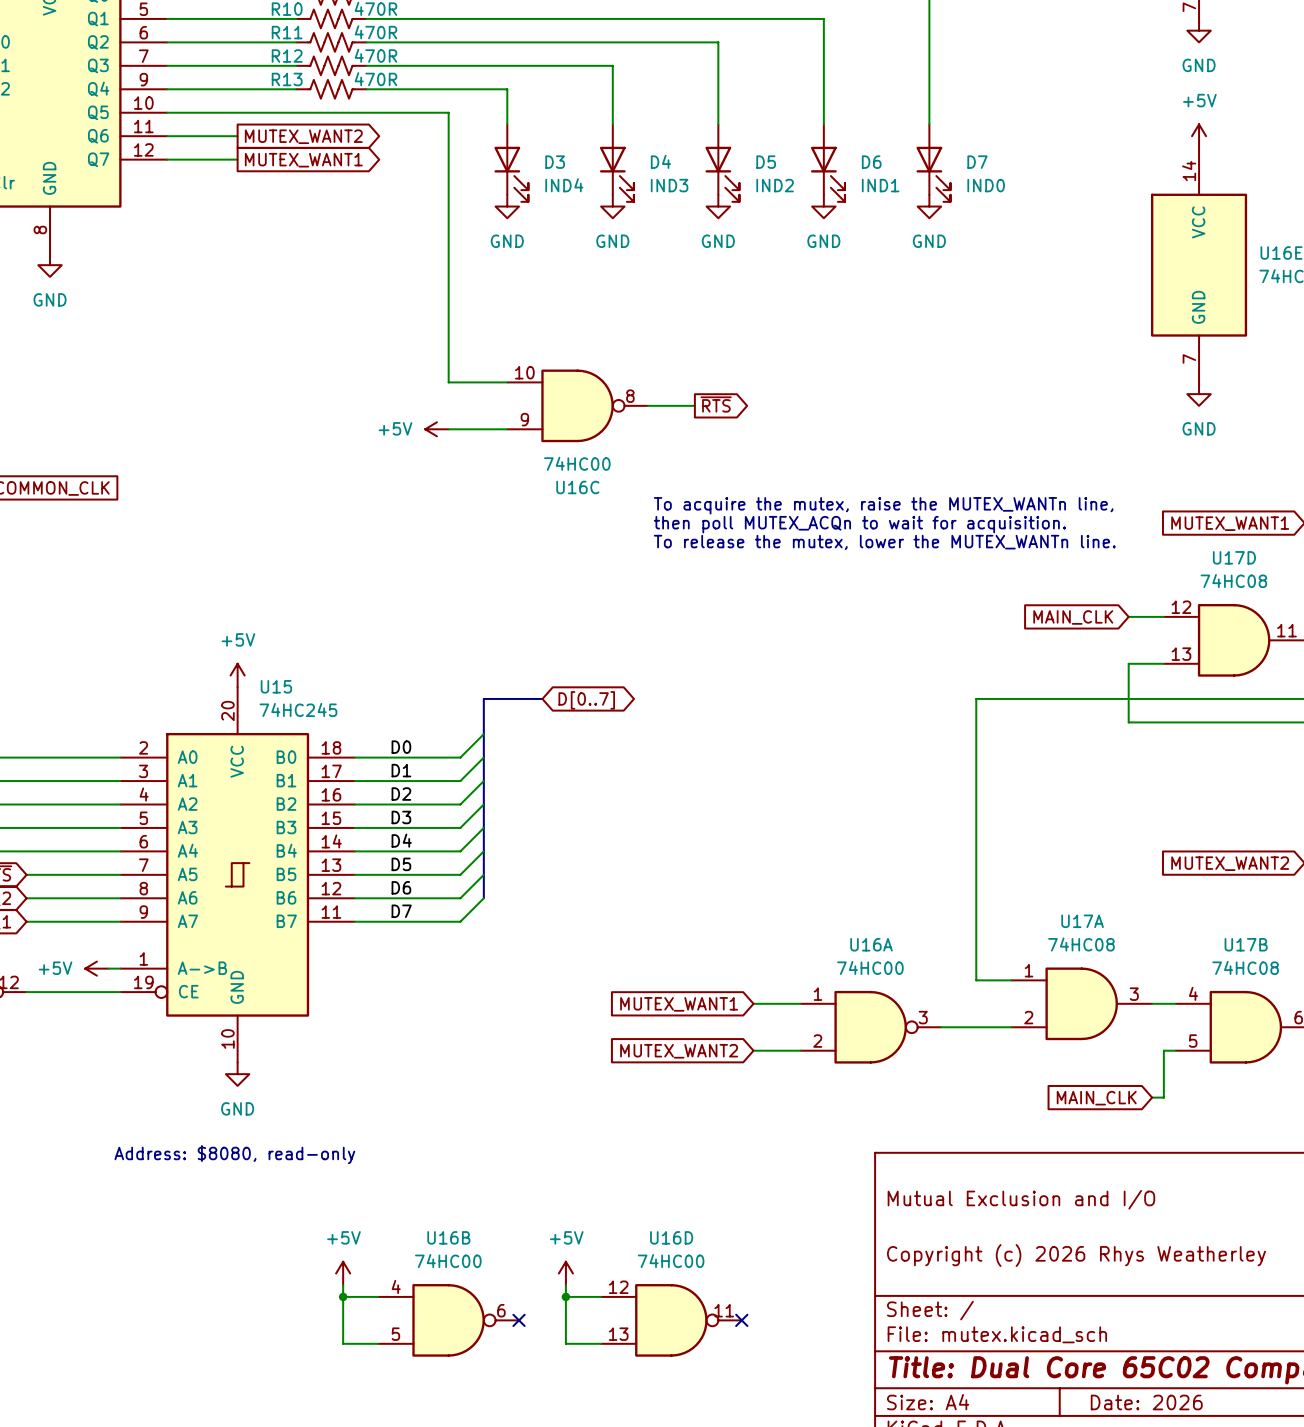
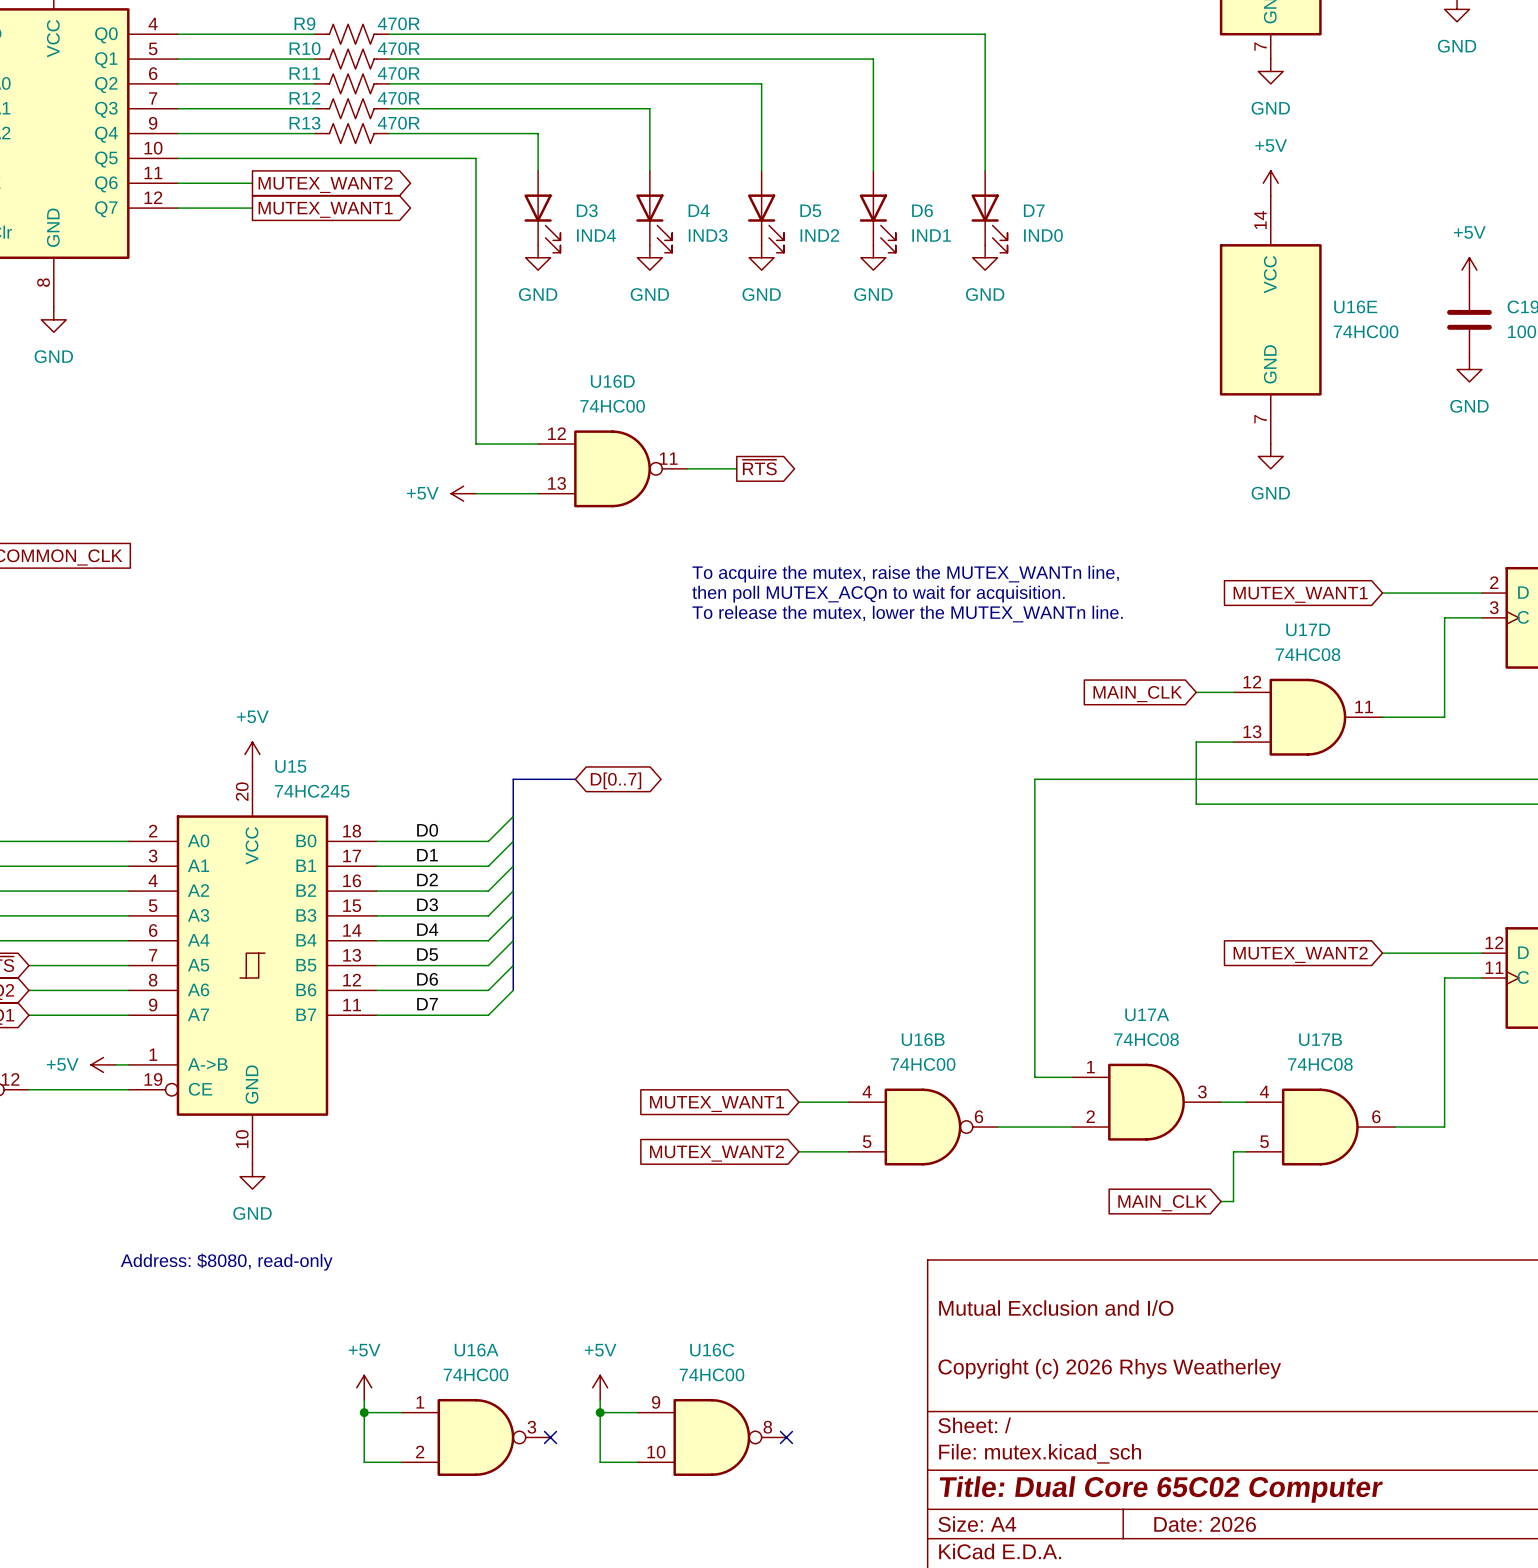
U16C flip: as is (577, 405) -> up-down (711, 1437)
U16C position: (577, 405) -> (711, 1437)
U16A position: (870, 1027) -> (476, 1437)
U16B position: (448, 1320) -> (923, 1127)
U16D position: (671, 1320) -> (612, 468)

